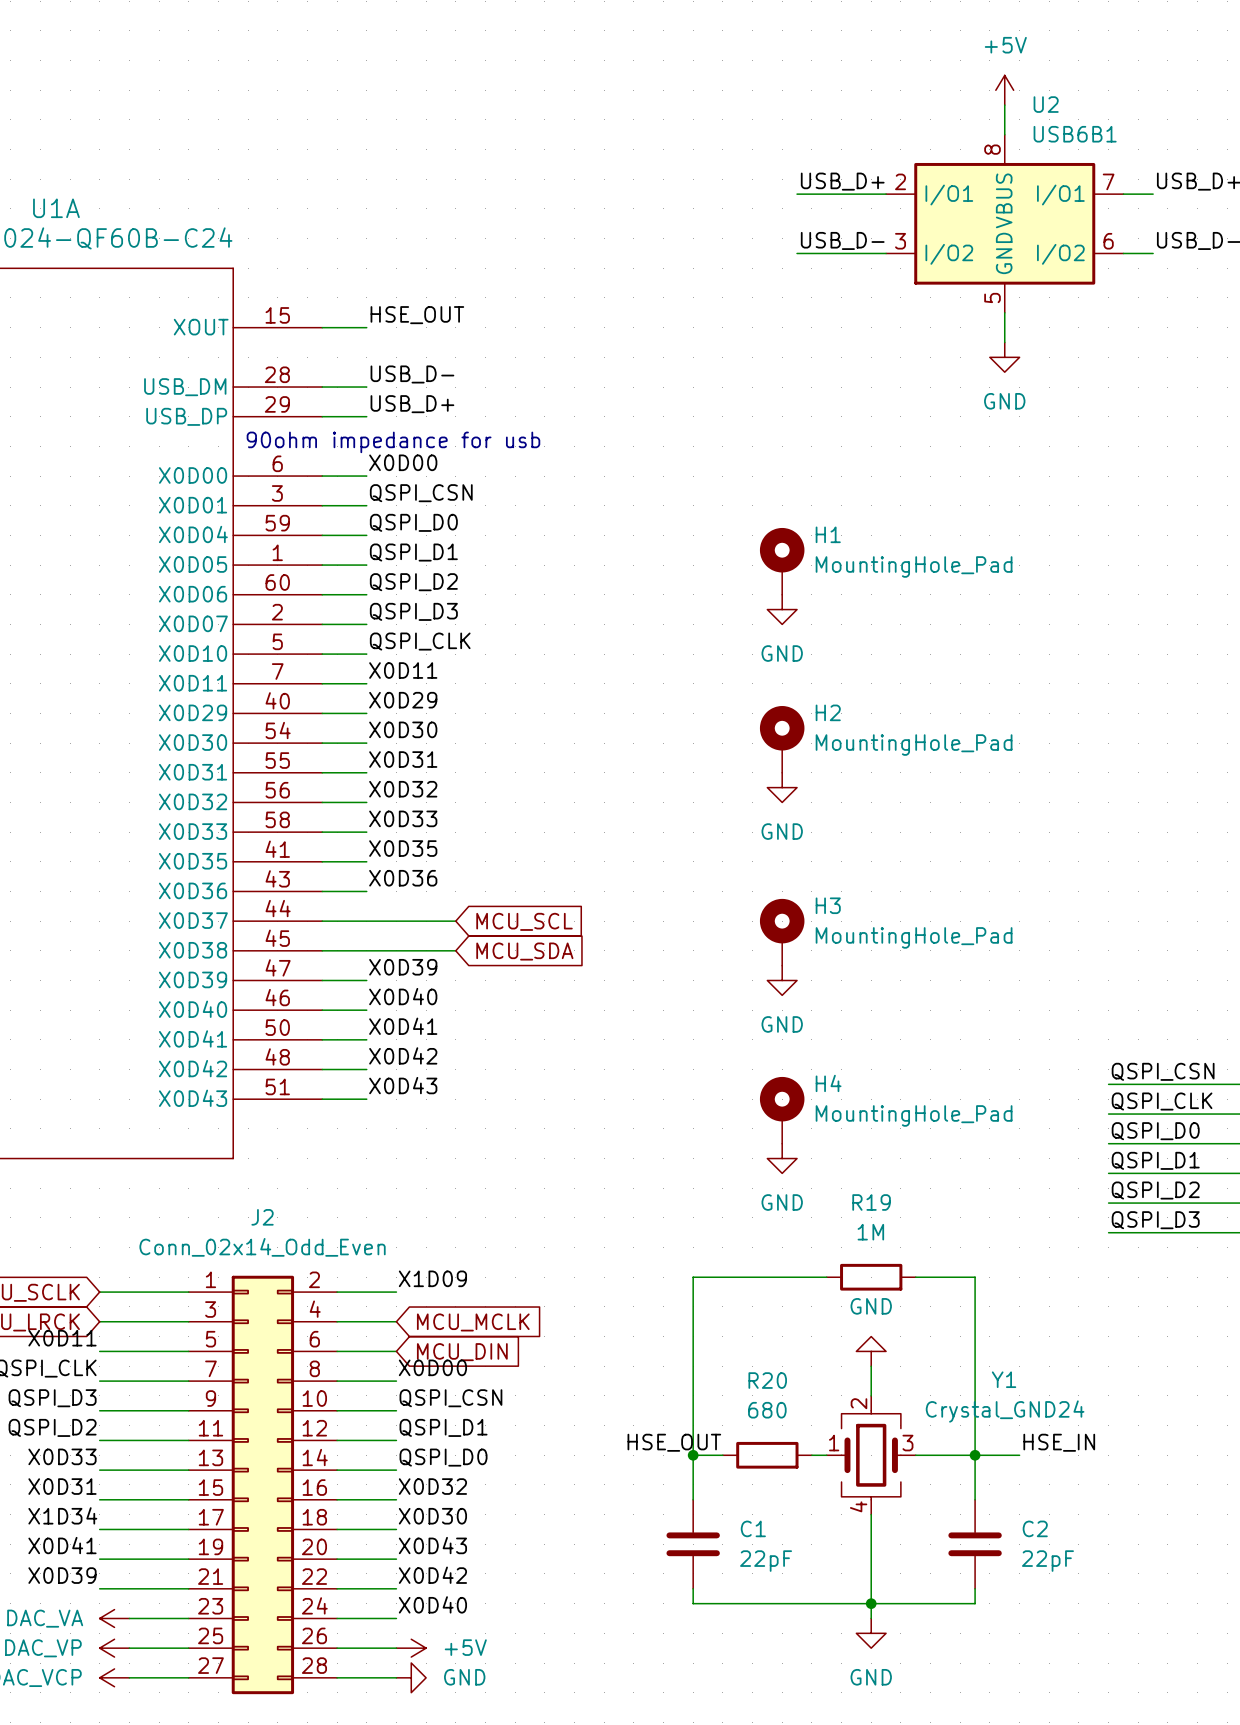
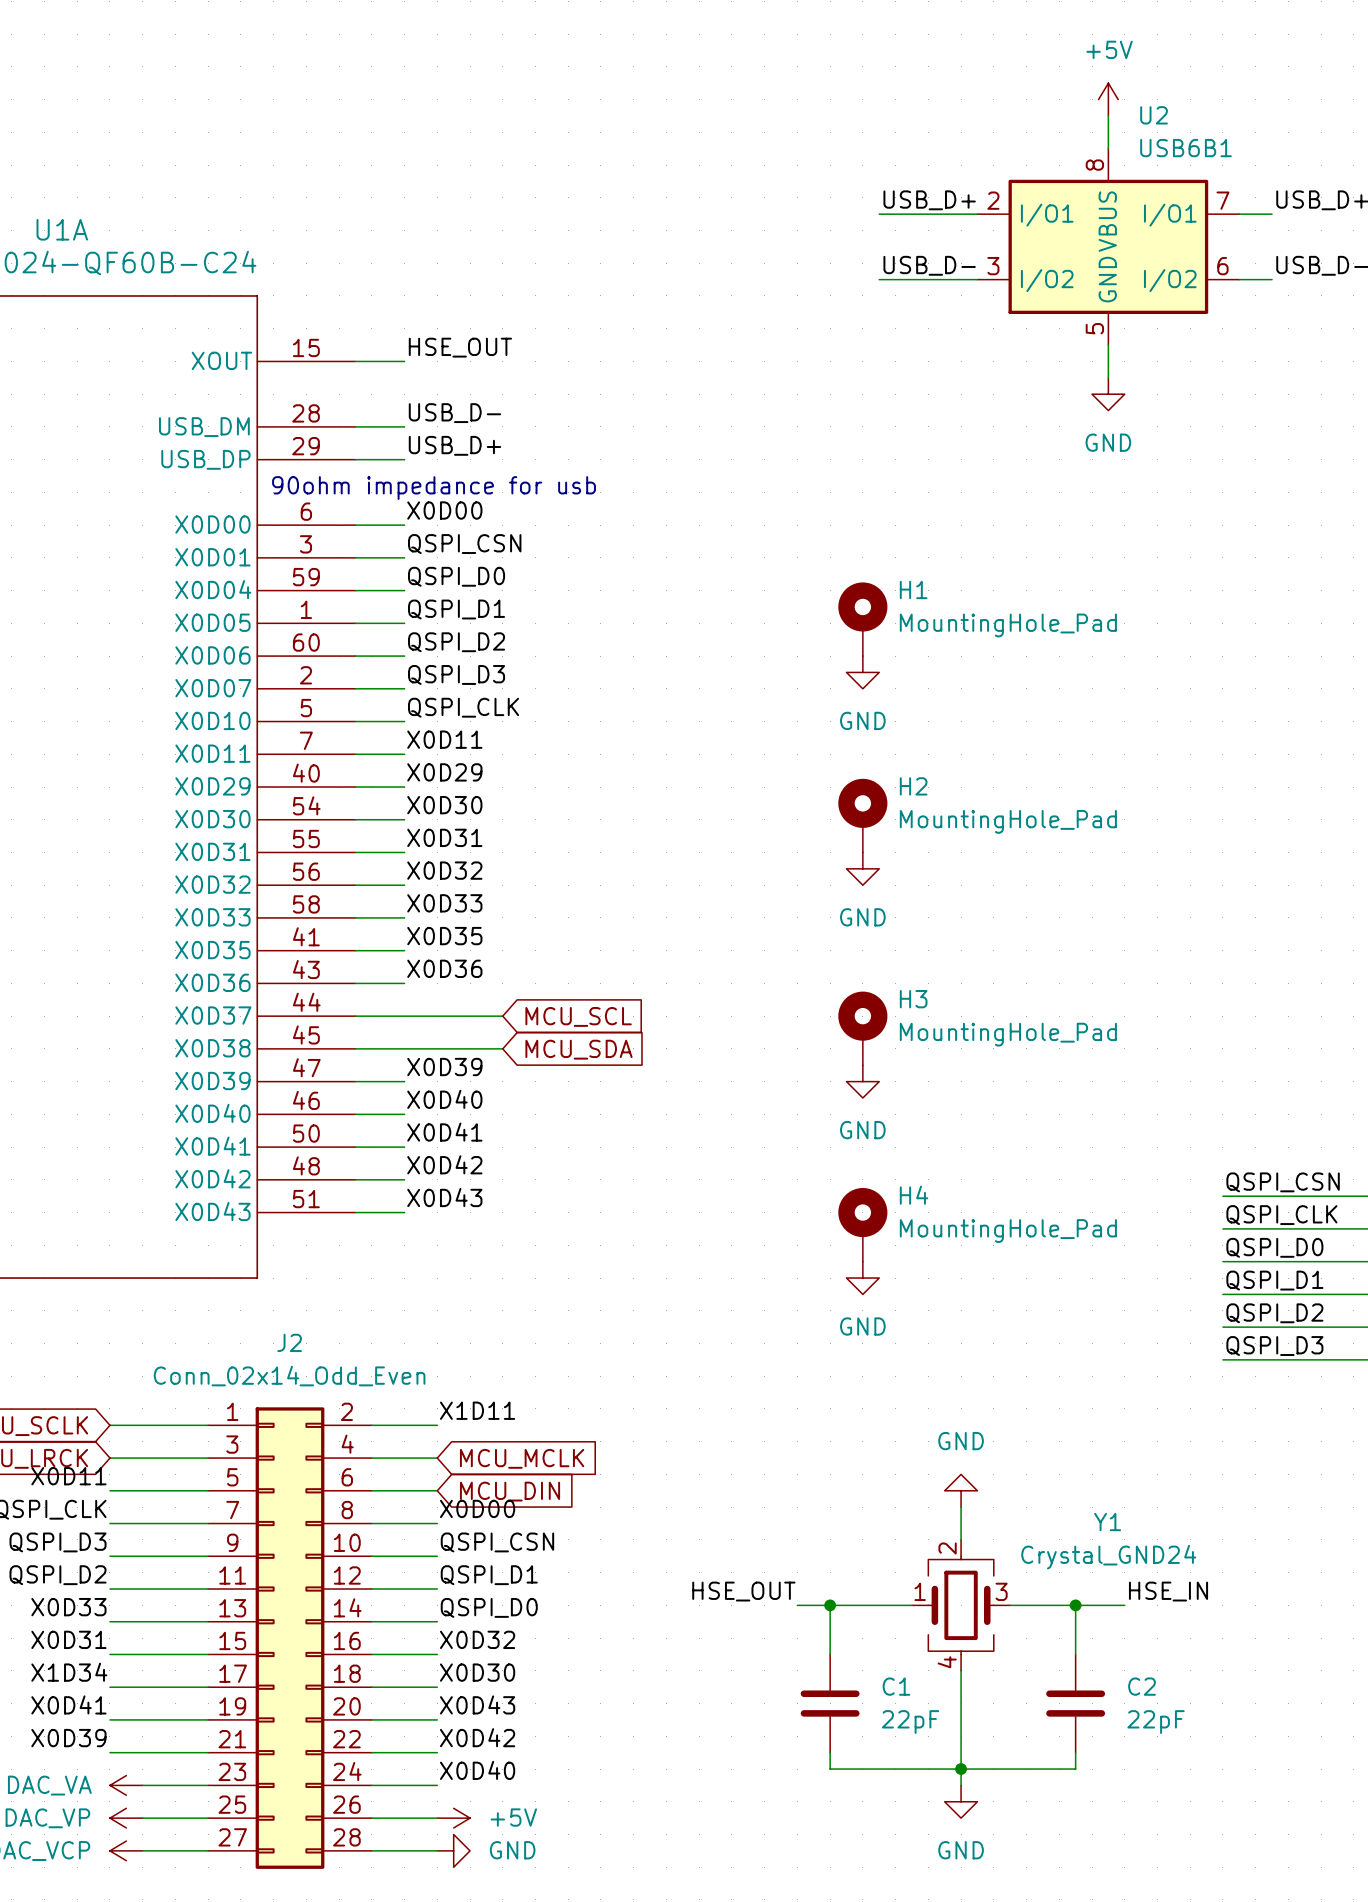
wire: (826, 1277) (693, 1277) (693, 1499) -> none
R19: 1M (871, 1277) -> none
wire: (915, 1277) (975, 1277) (975, 1455) -> none
label: X1D09 (432, 1278) -> X1D11 (477, 1410)
wire: (693, 1455) (722, 1455) -> (895, 1605) (797, 1605)
junction position: (693, 1455) -> (830, 1605)
wire: none -> (830, 1605) (830, 1654)
R20: 680 (767, 1455) -> none
C1 position: (693, 1544) -> (830, 1703)
wire: (693, 1588) (693, 1603) (752, 1603) -> (830, 1752) (830, 1769)

